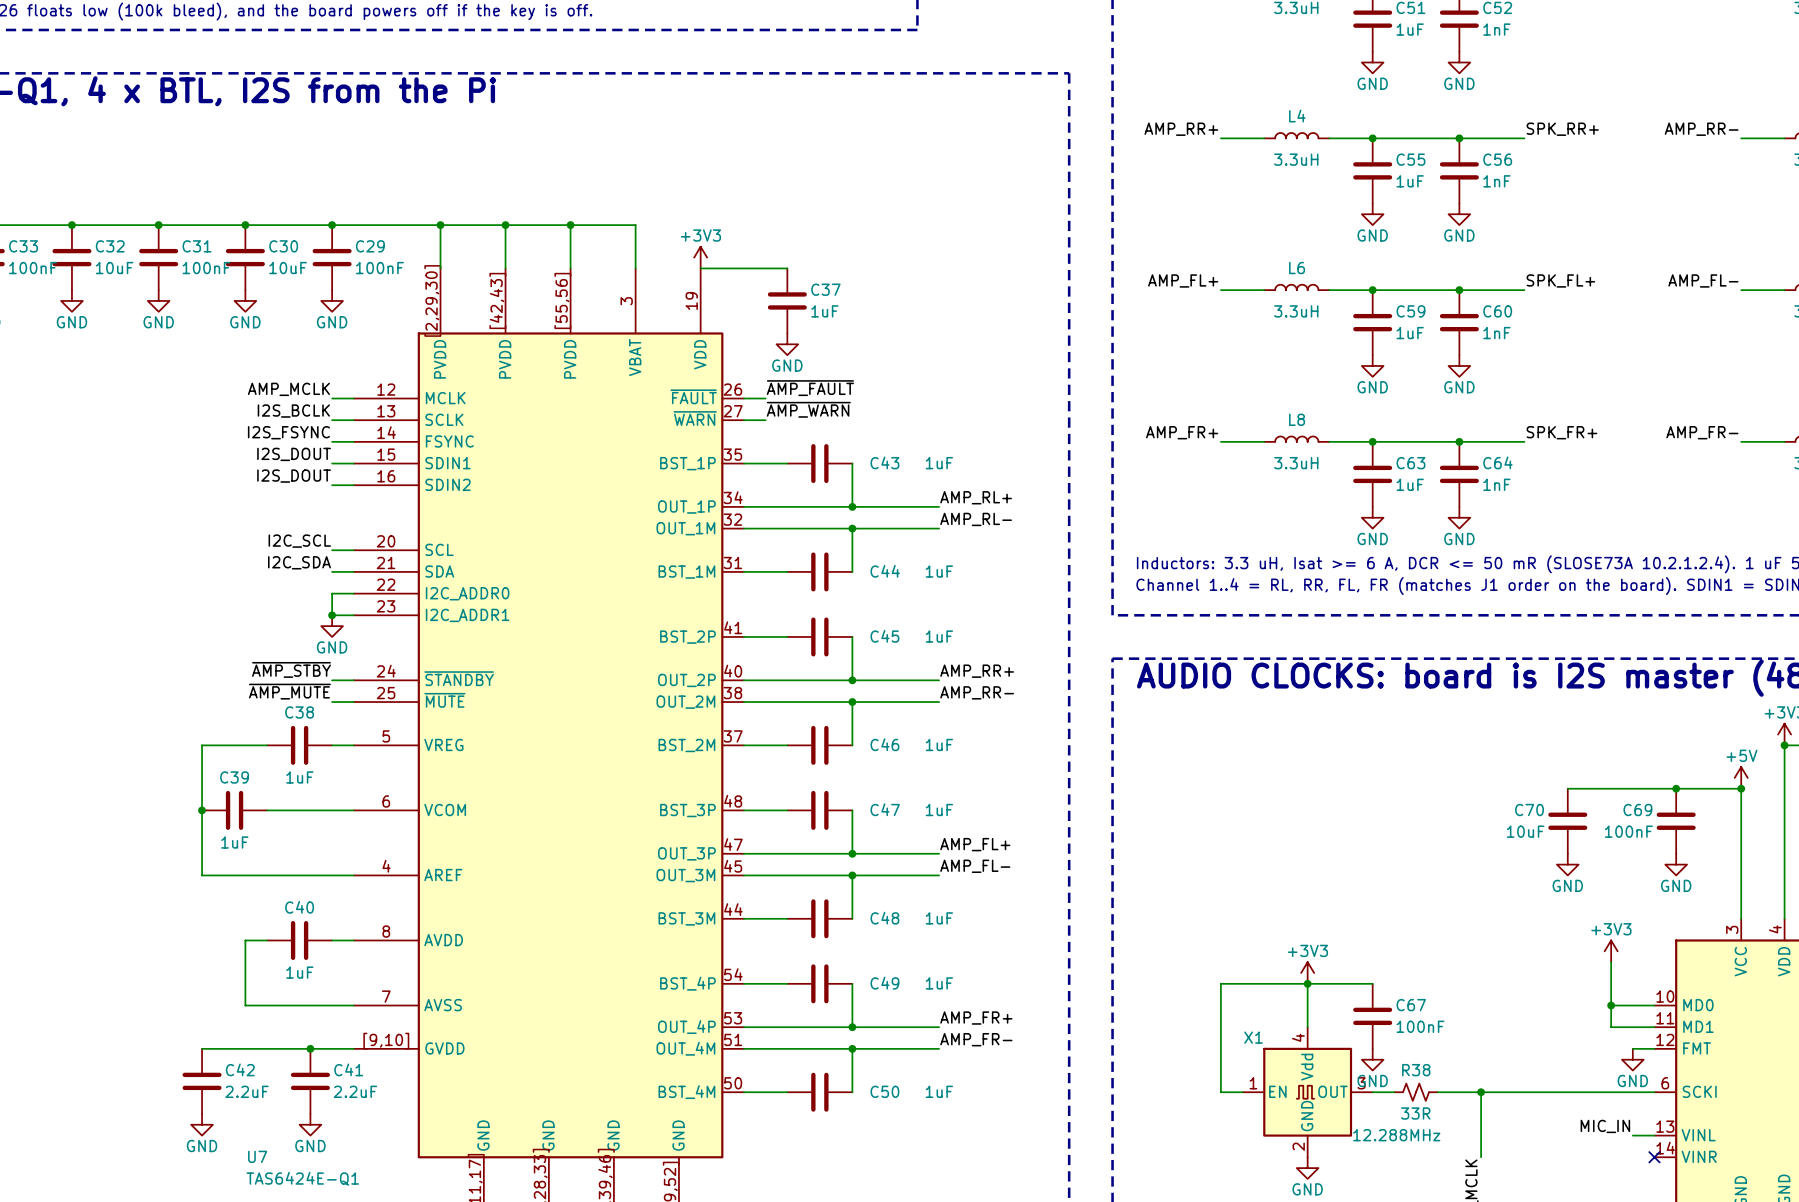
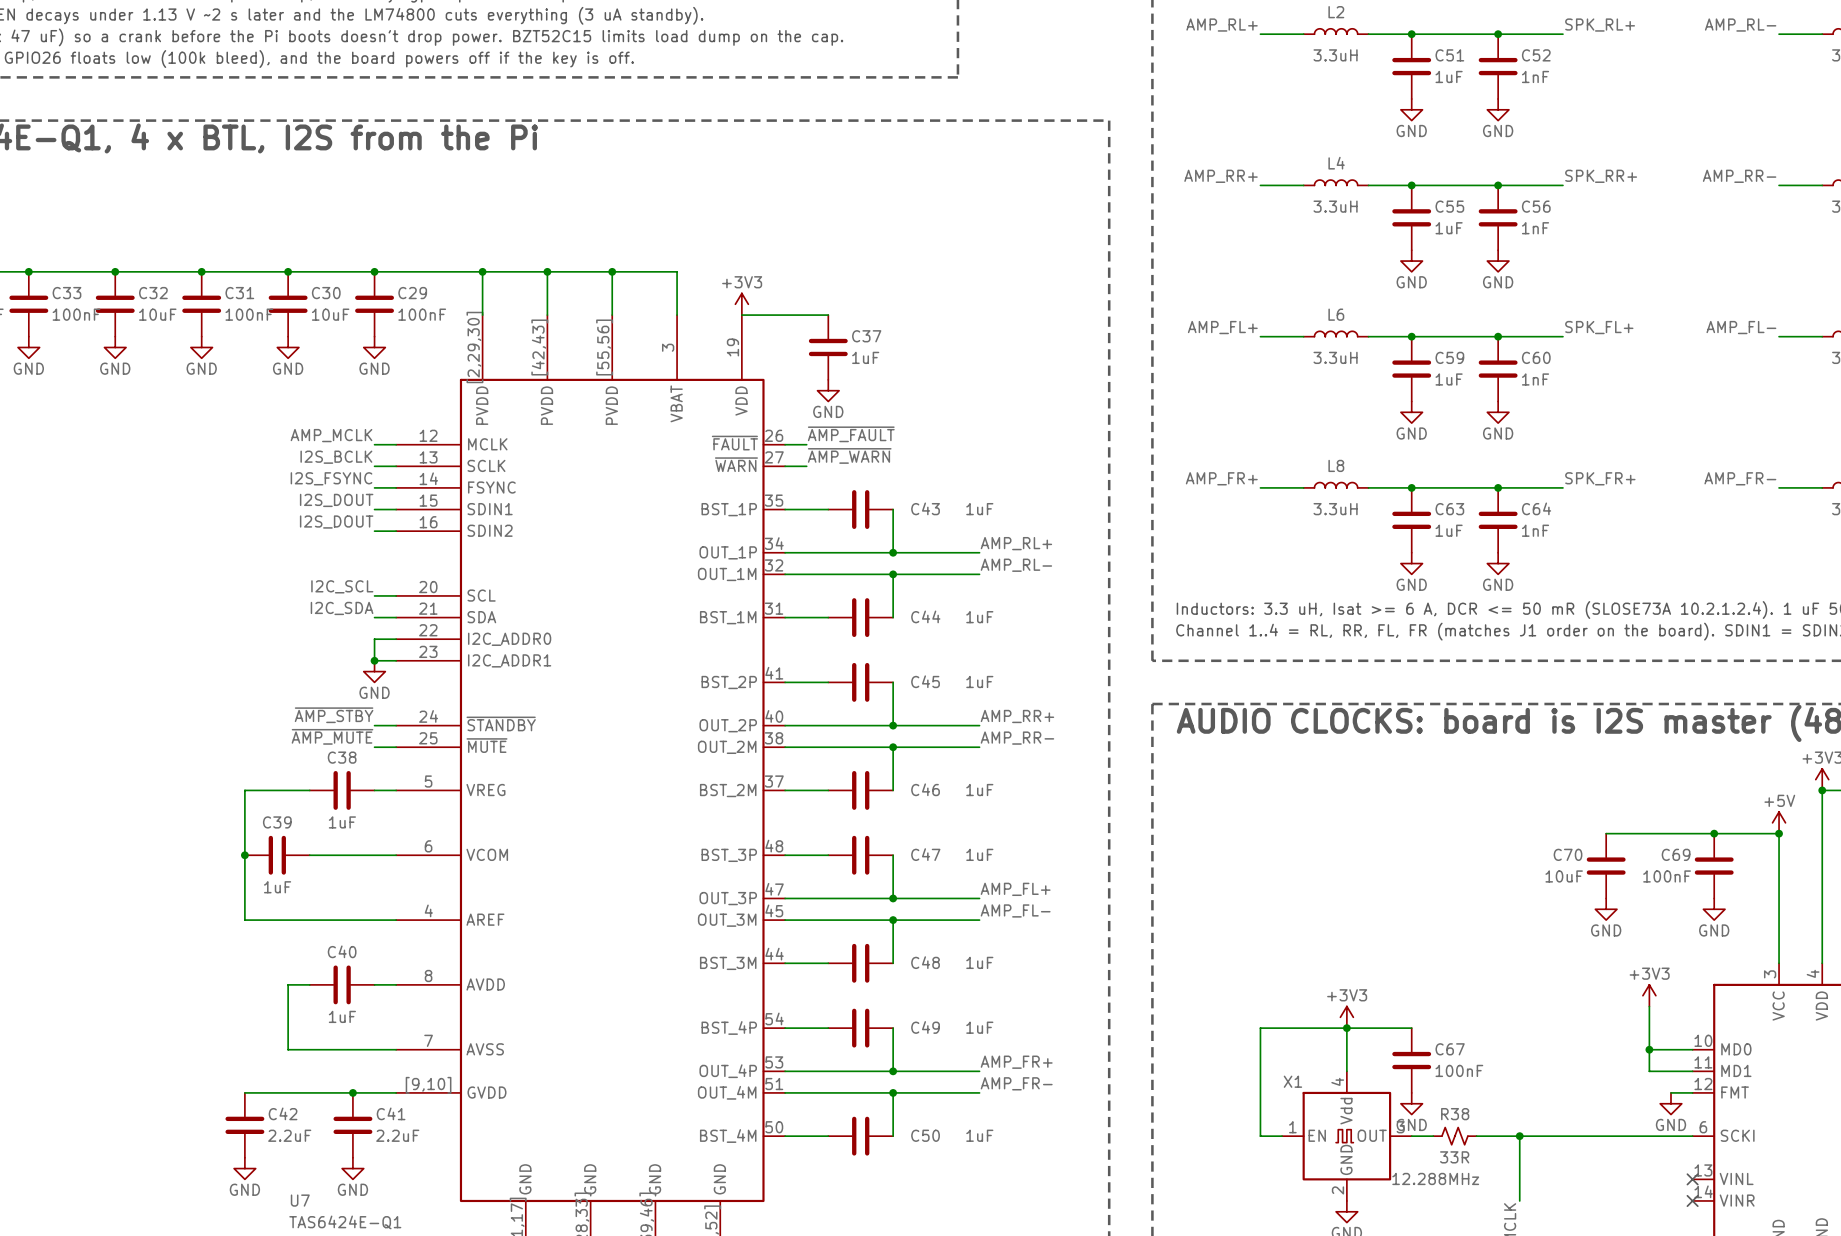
label: MIC_IN (1605, 1126) -> none
wire: (1632, 1135) (1654, 1135) -> none
no-connect mark: none -> (1692, 1179)

